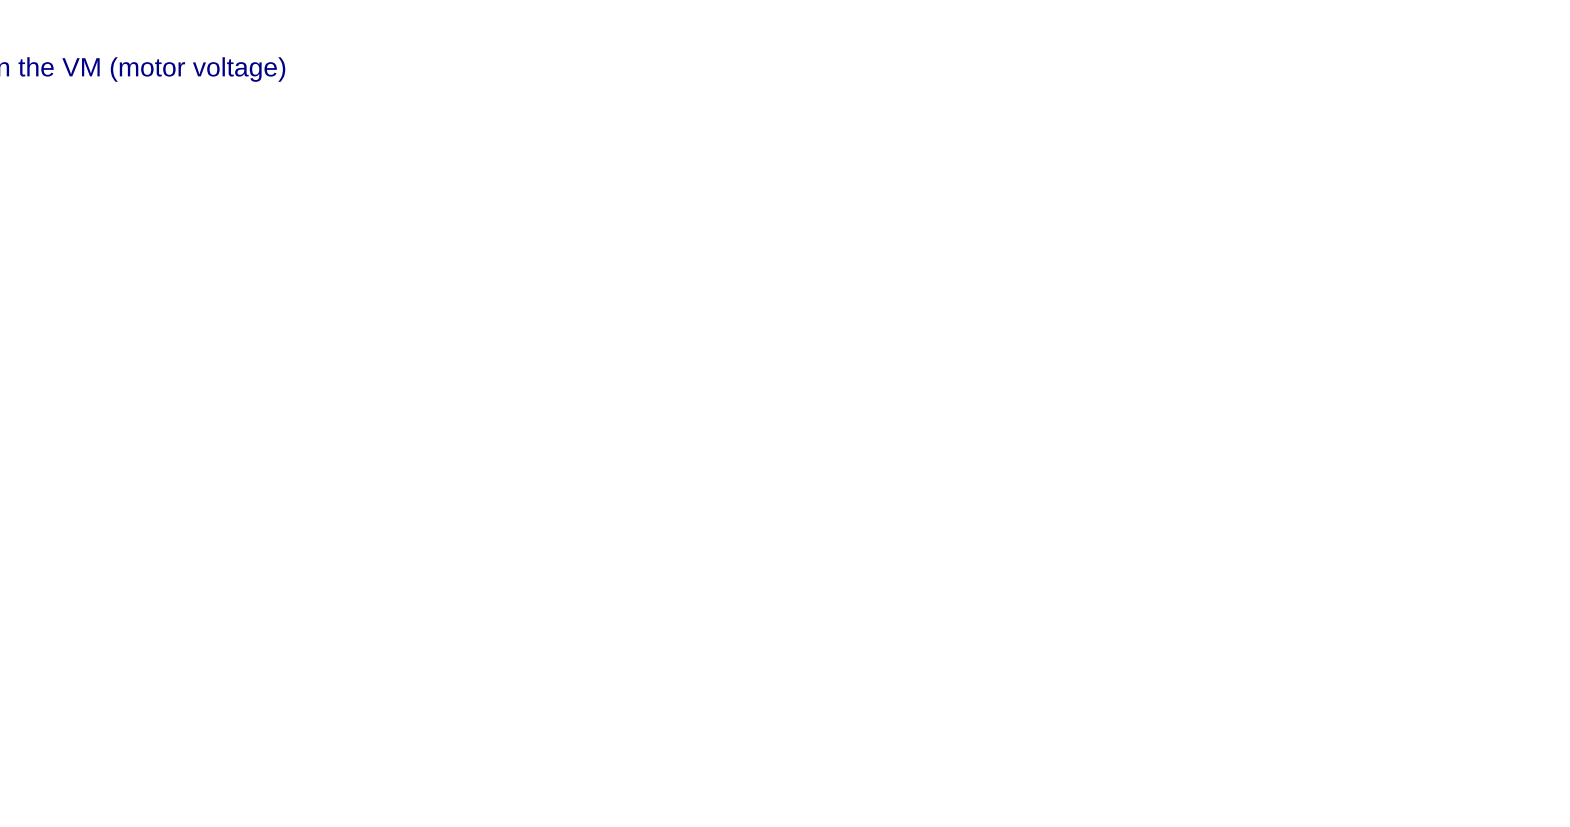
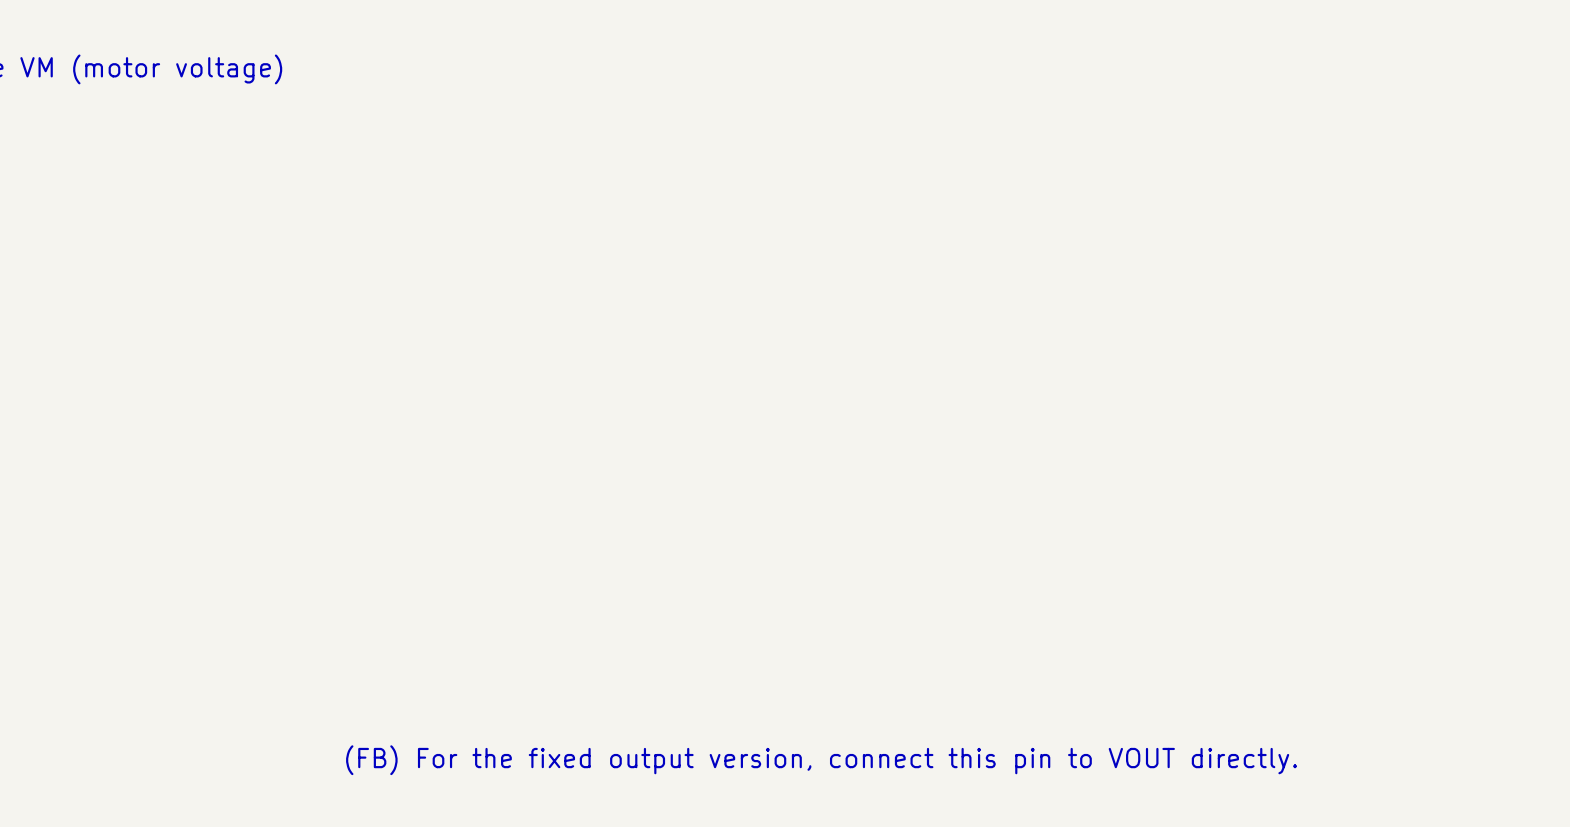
text: none -> (FB) For the fixed output version, connect this pin to VOUT directly. (821, 760)

